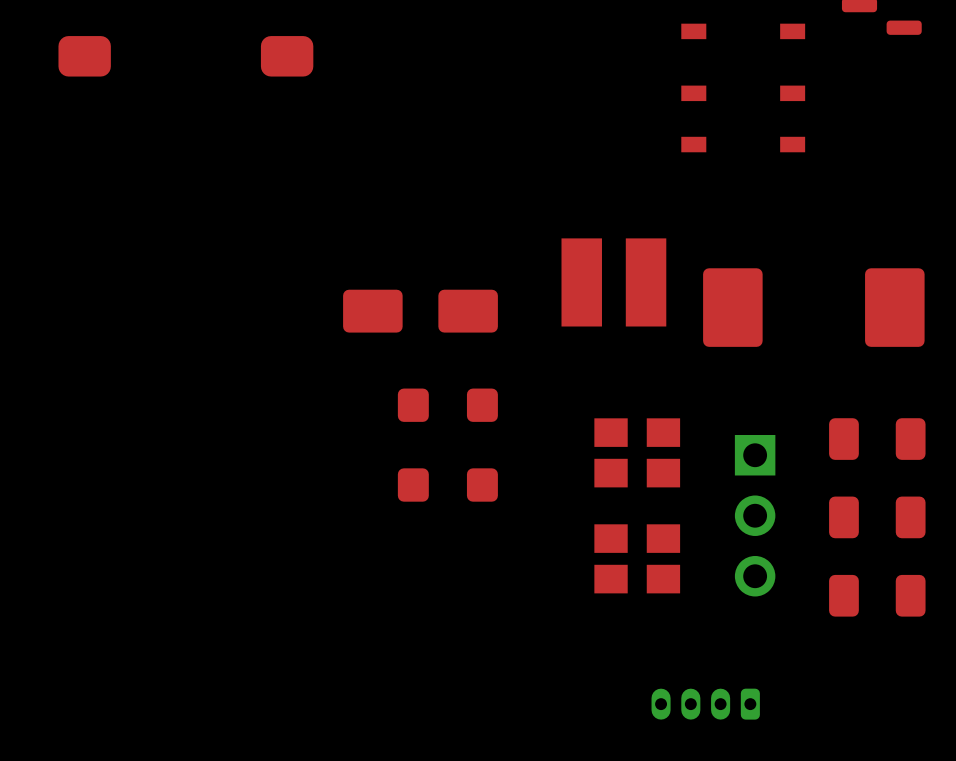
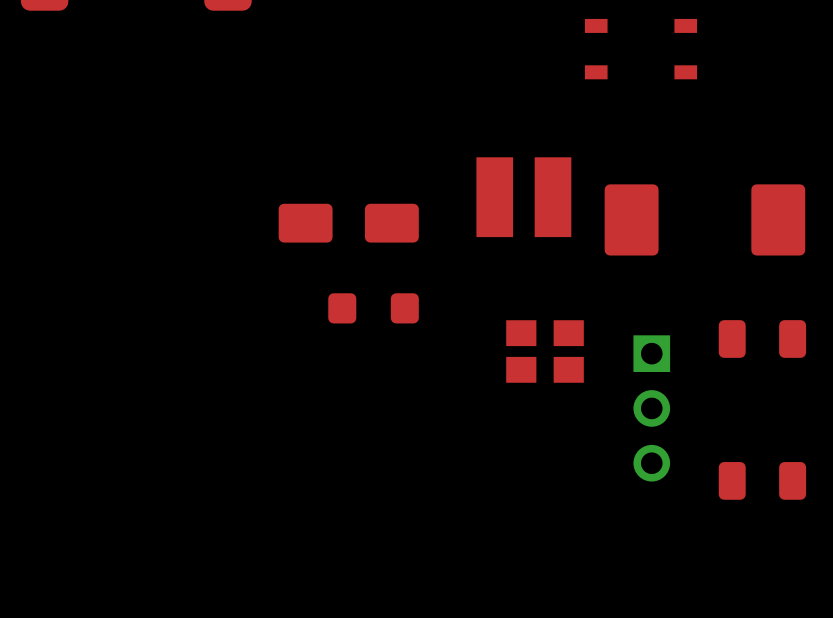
part: (447, 485) -> none
part: (877, 517) -> none
part: (637, 558) -> none
part: (705, 704) -> none

